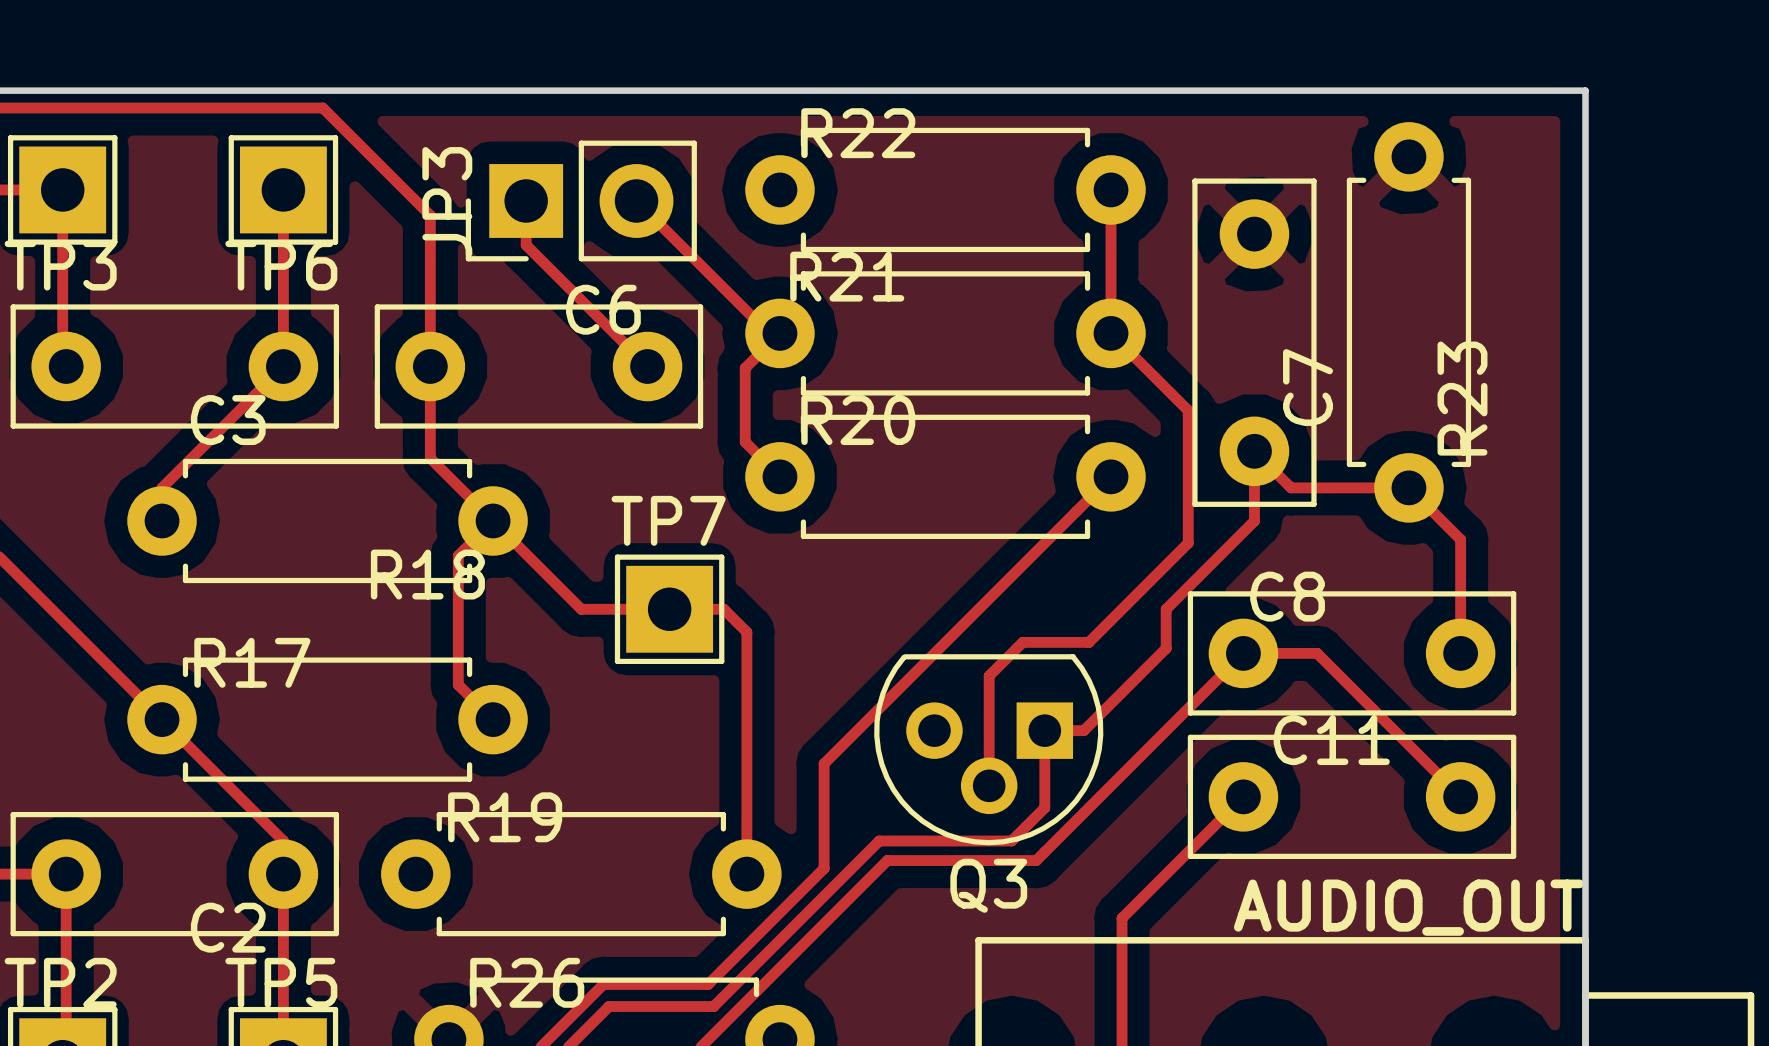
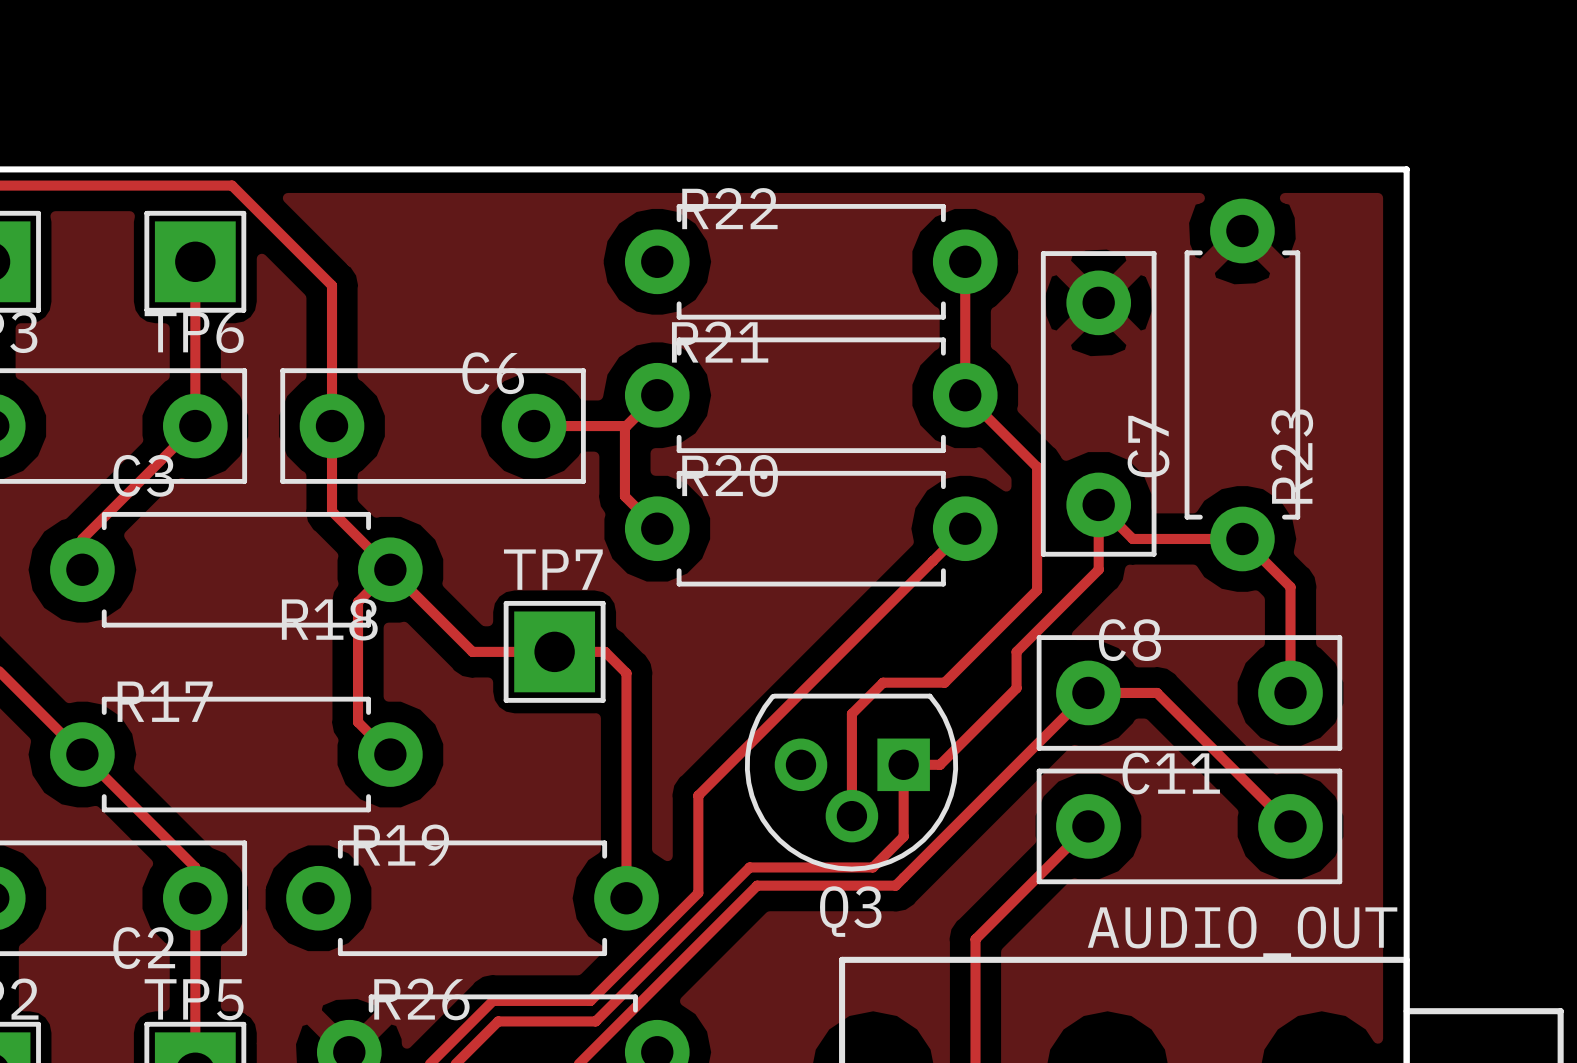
track: (526, 200) (526, 245) (647, 366) -> (626, 426) (534, 426)
JP3: (581, 200) -> none
track: (636, 200) (768, 333) (779, 333) -> none

